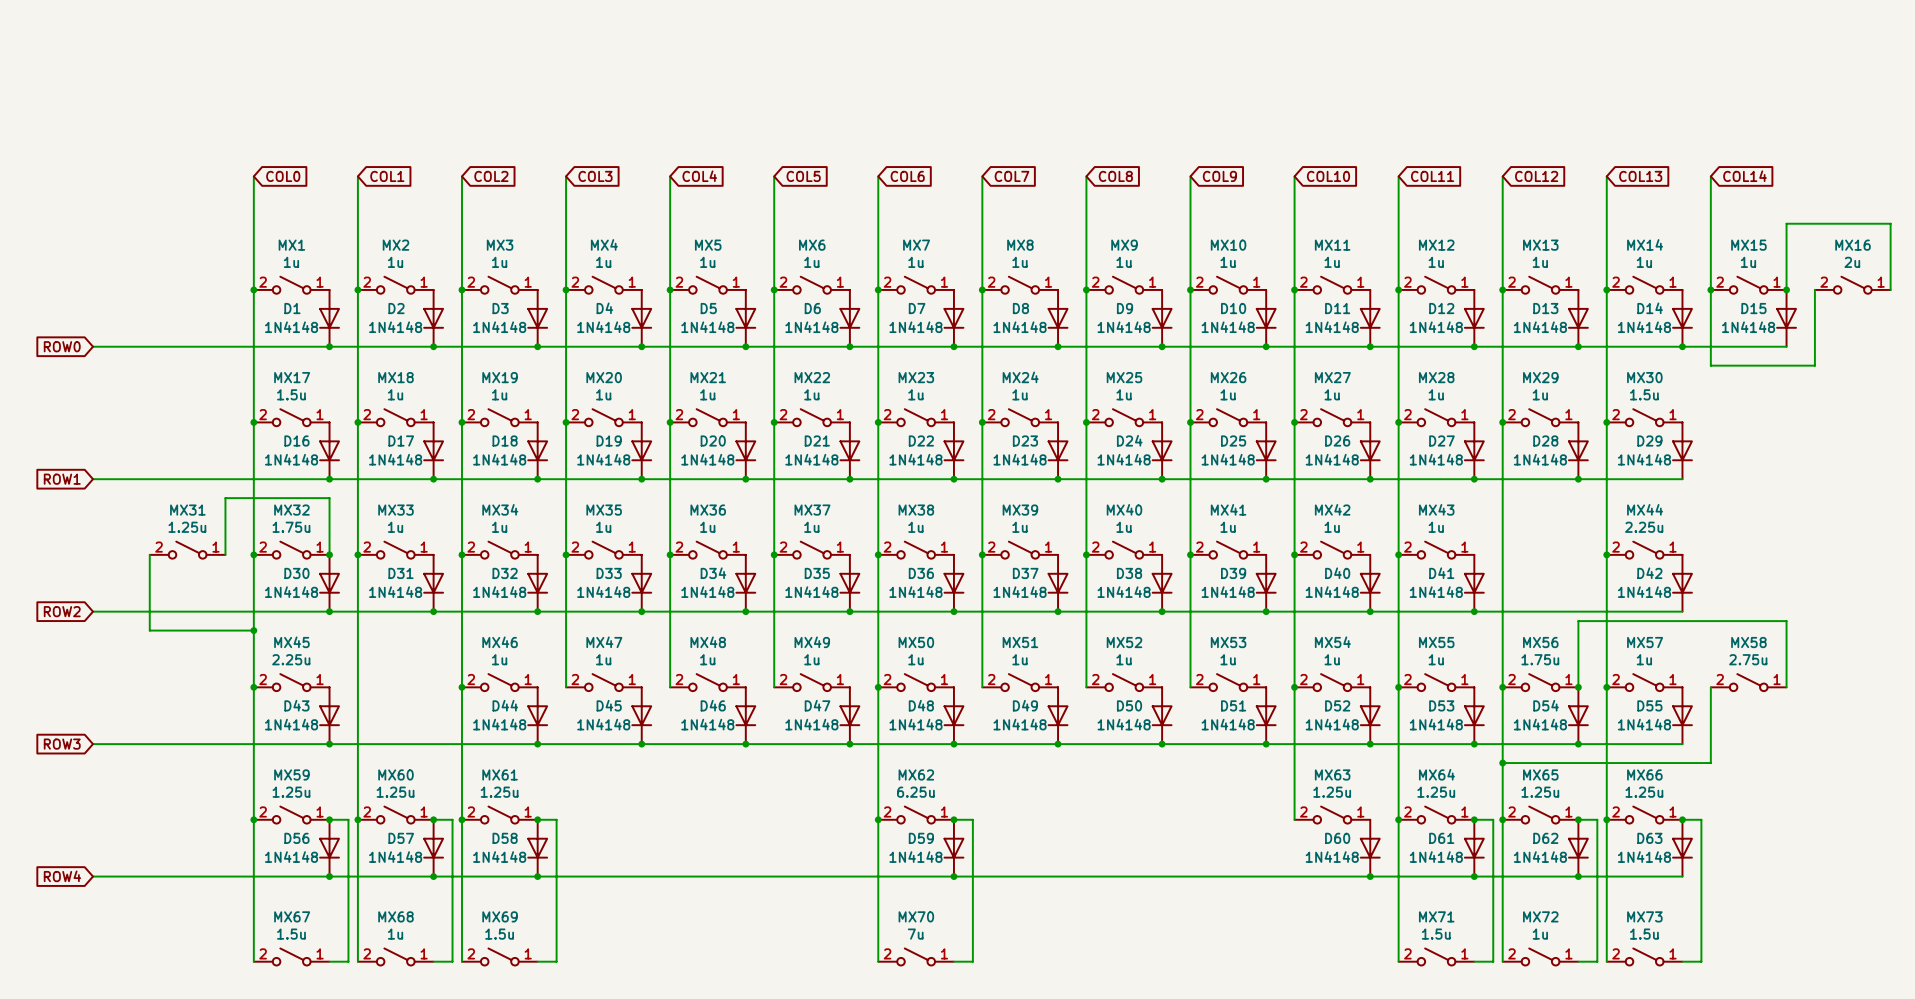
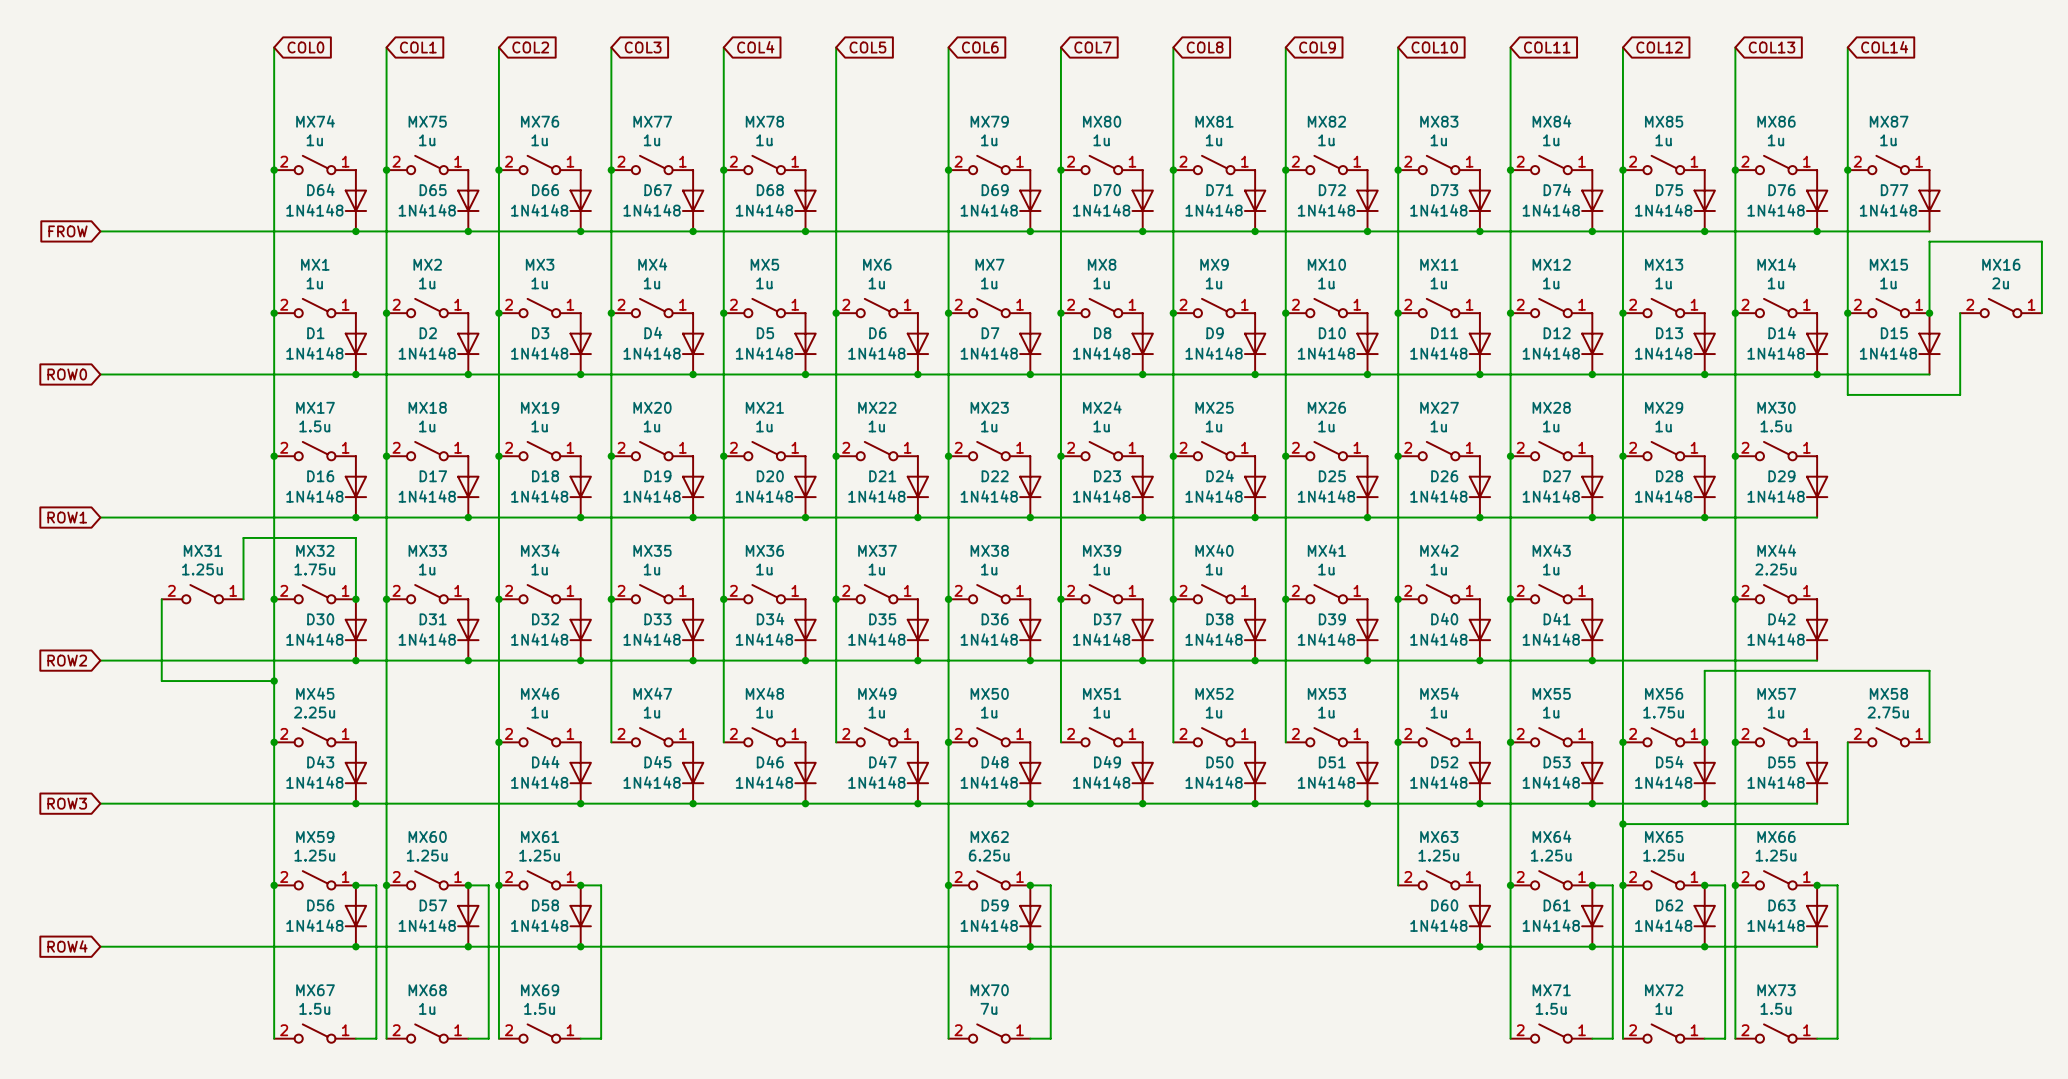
wire: none -> (274, 47) (274, 190)
wire: none -> (386, 47) (386, 190)
wire: none -> (498, 47) (498, 190)
wire: none -> (611, 47) (611, 190)
wire: none -> (723, 47) (723, 190)
wire: none -> (836, 47) (836, 190)
wire: none -> (948, 47) (948, 190)
wire: none -> (1060, 47) (1060, 190)
wire: none -> (1173, 47) (1173, 190)
wire: none -> (1285, 47) (1285, 190)
wire: none -> (1398, 47) (1398, 190)
wire: none -> (1510, 47) (1510, 190)
wire: none -> (1622, 47) (1622, 190)
wire: none -> (1735, 47) (1735, 190)
wire: none -> (1847, 47) (1847, 190)
MX74: none -> 1u (315, 165)
MX75: none -> 1u (427, 165)
MX76: none -> 1u (539, 165)
MX77: none -> 1u (652, 165)
MX78: none -> 1u (764, 165)
MX79: none -> 1u (989, 165)
MX80: none -> 1u (1101, 165)
MX81: none -> 1u (1214, 165)
MX82: none -> 1u (1326, 165)
MX83: none -> 1u (1439, 165)
MX84: none -> 1u (1551, 165)
MX85: none -> 1u (1663, 165)
MX86: none -> 1u (1776, 165)
MX87: none -> 1u (1888, 165)
junction: none -> (274, 170)
junction: none -> (386, 170)
junction: none -> (498, 170)
junction: none -> (611, 170)
junction: none -> (723, 170)
junction: none -> (948, 170)
junction: none -> (1060, 170)
junction: none -> (1173, 170)
junction: none -> (1285, 170)
junction: none -> (1398, 170)
junction: none -> (1510, 170)
junction: none -> (1622, 170)
junction: none -> (1735, 170)
junction: none -> (1847, 170)
global label position: COL0 (283, 176) -> COL0 (305, 47)
global label position: COL1 (387, 176) -> COL1 (418, 47)
global label position: COL2 (491, 176) -> COL2 (530, 47)
global label position: COL3 (595, 176) -> COL3 (643, 47)
global label position: COL4 (699, 176) -> COL4 (755, 47)
global label position: COL5 (803, 176) -> COL5 (867, 47)
global label position: COL6 (907, 176) -> COL6 (980, 47)
global label position: COL7 (1011, 176) -> COL7 (1092, 47)
global label position: COL8 (1115, 176) -> COL8 (1205, 47)
global label position: COL9 (1219, 176) -> COL9 (1317, 47)
global label position: COL10 (1328, 176) -> COL10 (1434, 47)
global label position: COL11 (1432, 176) -> COL11 (1547, 47)
global label position: COL12 (1536, 176) -> COL12 (1659, 47)
global label position: COL13 (1640, 176) -> COL13 (1772, 47)
global label position: COL14 (1745, 176) -> COL14 (1884, 47)
D64: none -> 1N4148 (355, 200)
D65: none -> 1N4148 (468, 200)
D66: none -> 1N4148 (580, 200)
D67: none -> 1N4148 (693, 200)
D68: none -> 1N4148 (805, 200)
D69: none -> 1N4148 (1030, 200)
D70: none -> 1N4148 (1142, 200)
D71: none -> 1N4148 (1255, 200)
D72: none -> 1N4148 (1367, 200)
D73: none -> 1N4148 (1479, 200)
D74: none -> 1N4148 (1592, 200)
D75: none -> 1N4148 (1704, 200)
D76: none -> 1N4148 (1817, 200)
D77: none -> 1N4148 (1929, 200)
global label: none -> FROW (67, 231)
wire: none -> (100, 231) (1929, 231)
junction: none -> (355, 231)
junction: none -> (468, 231)
junction: none -> (580, 231)
junction: none -> (693, 231)
junction: none -> (805, 231)
junction: none -> (1030, 231)
junction: none -> (1142, 231)
junction: none -> (1255, 231)
junction: none -> (1367, 231)
junction: none -> (1479, 231)
junction: none -> (1592, 231)
junction: none -> (1704, 231)
junction: none -> (1817, 231)

